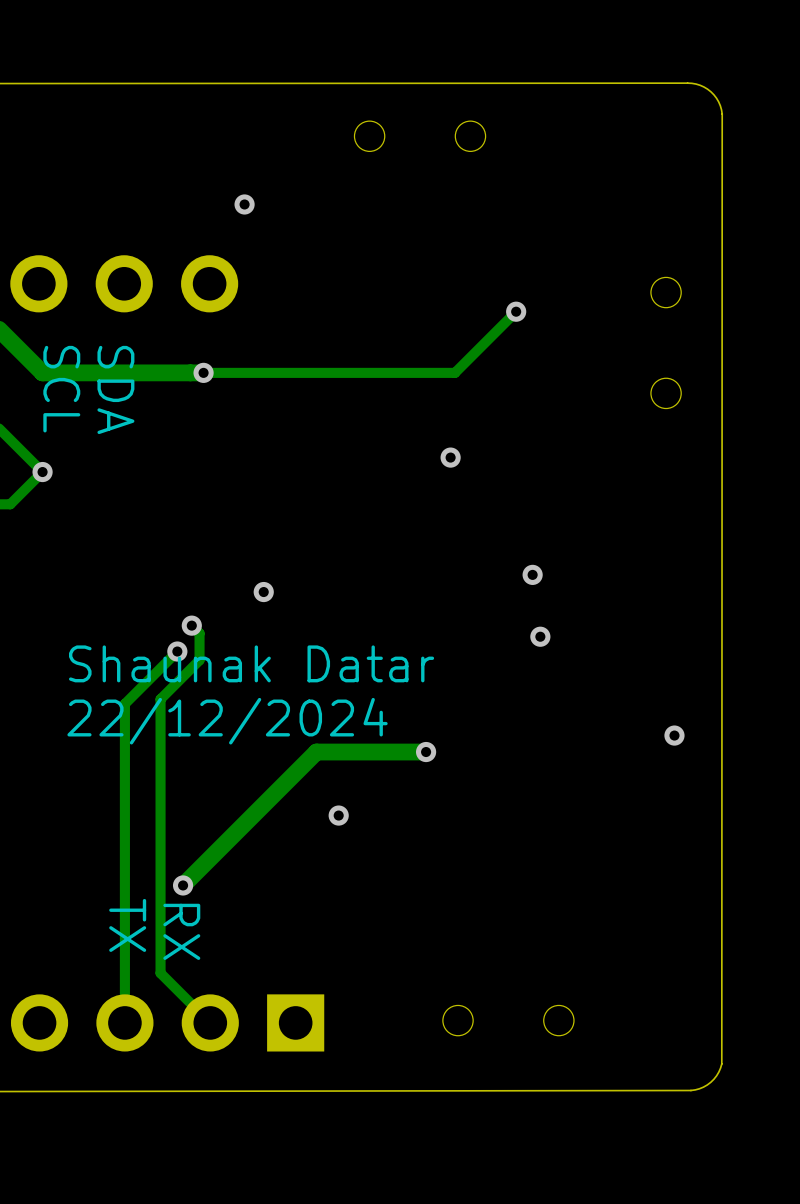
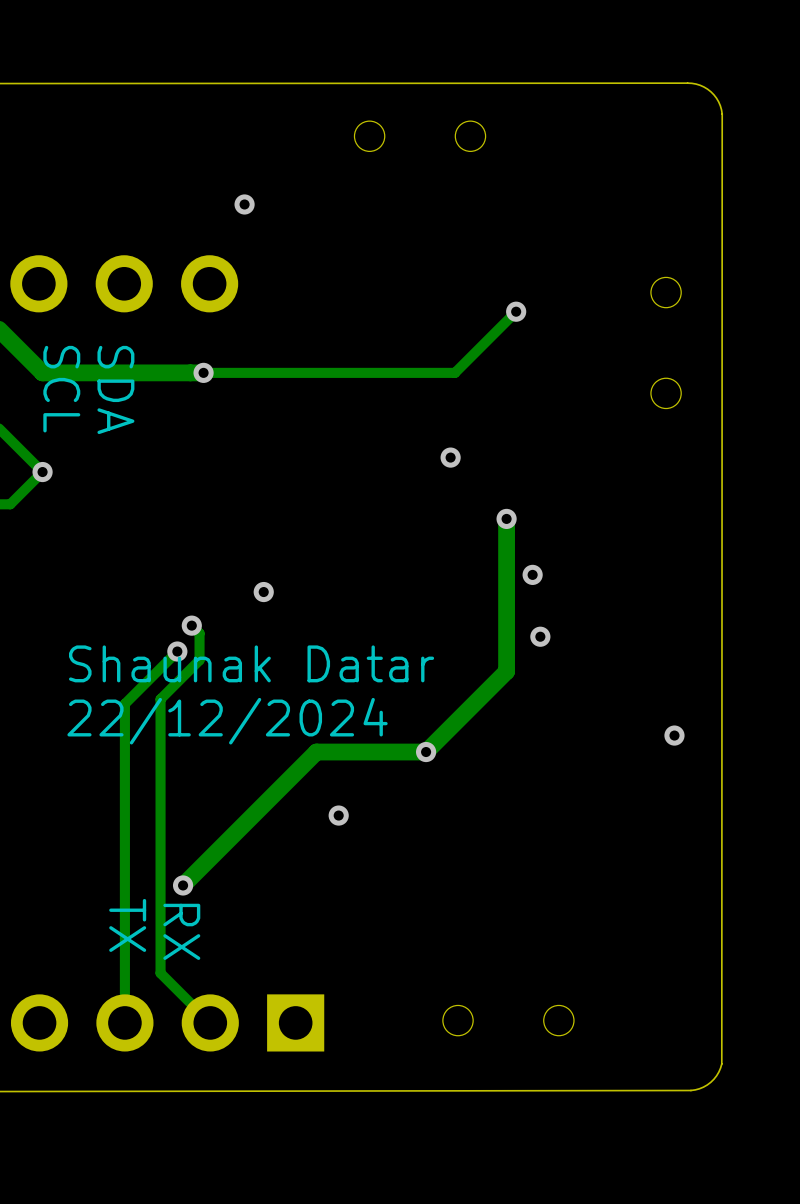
track: none -> (506, 518) (506, 671) (426, 752)
via: none -> (506, 518)

